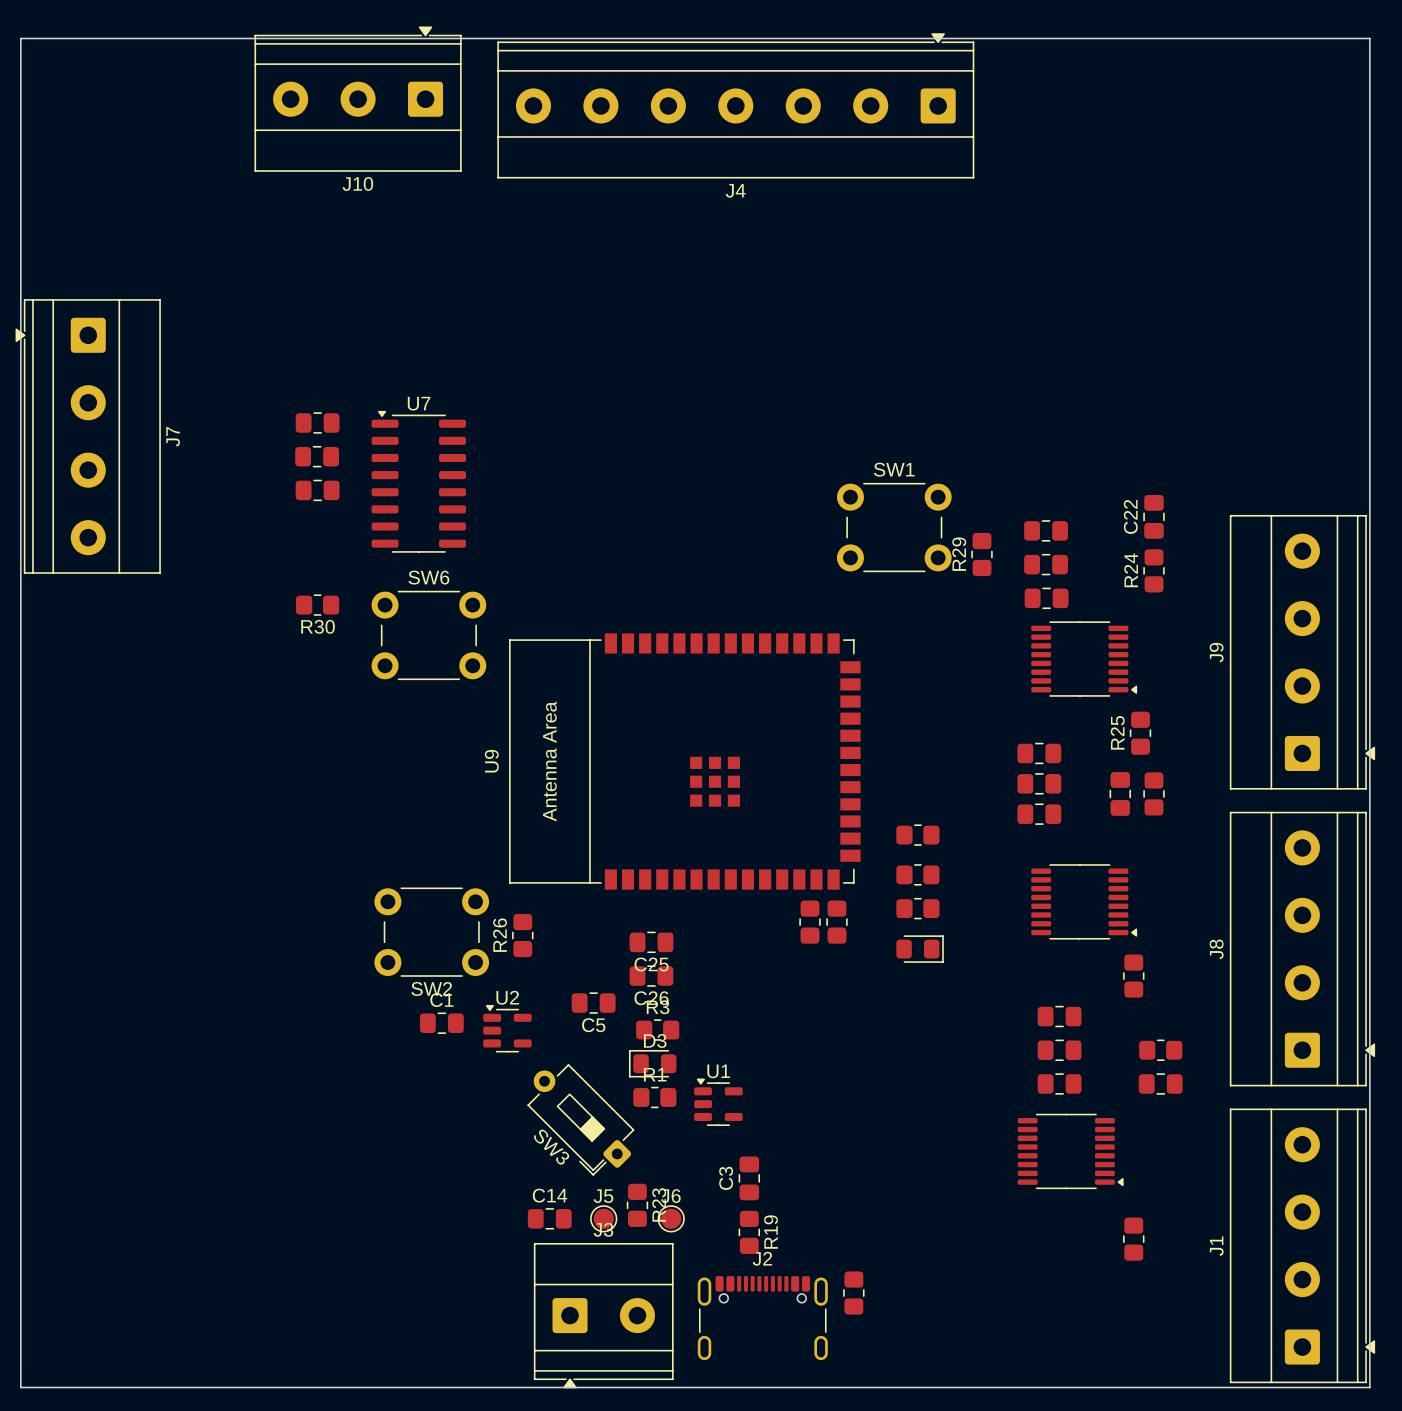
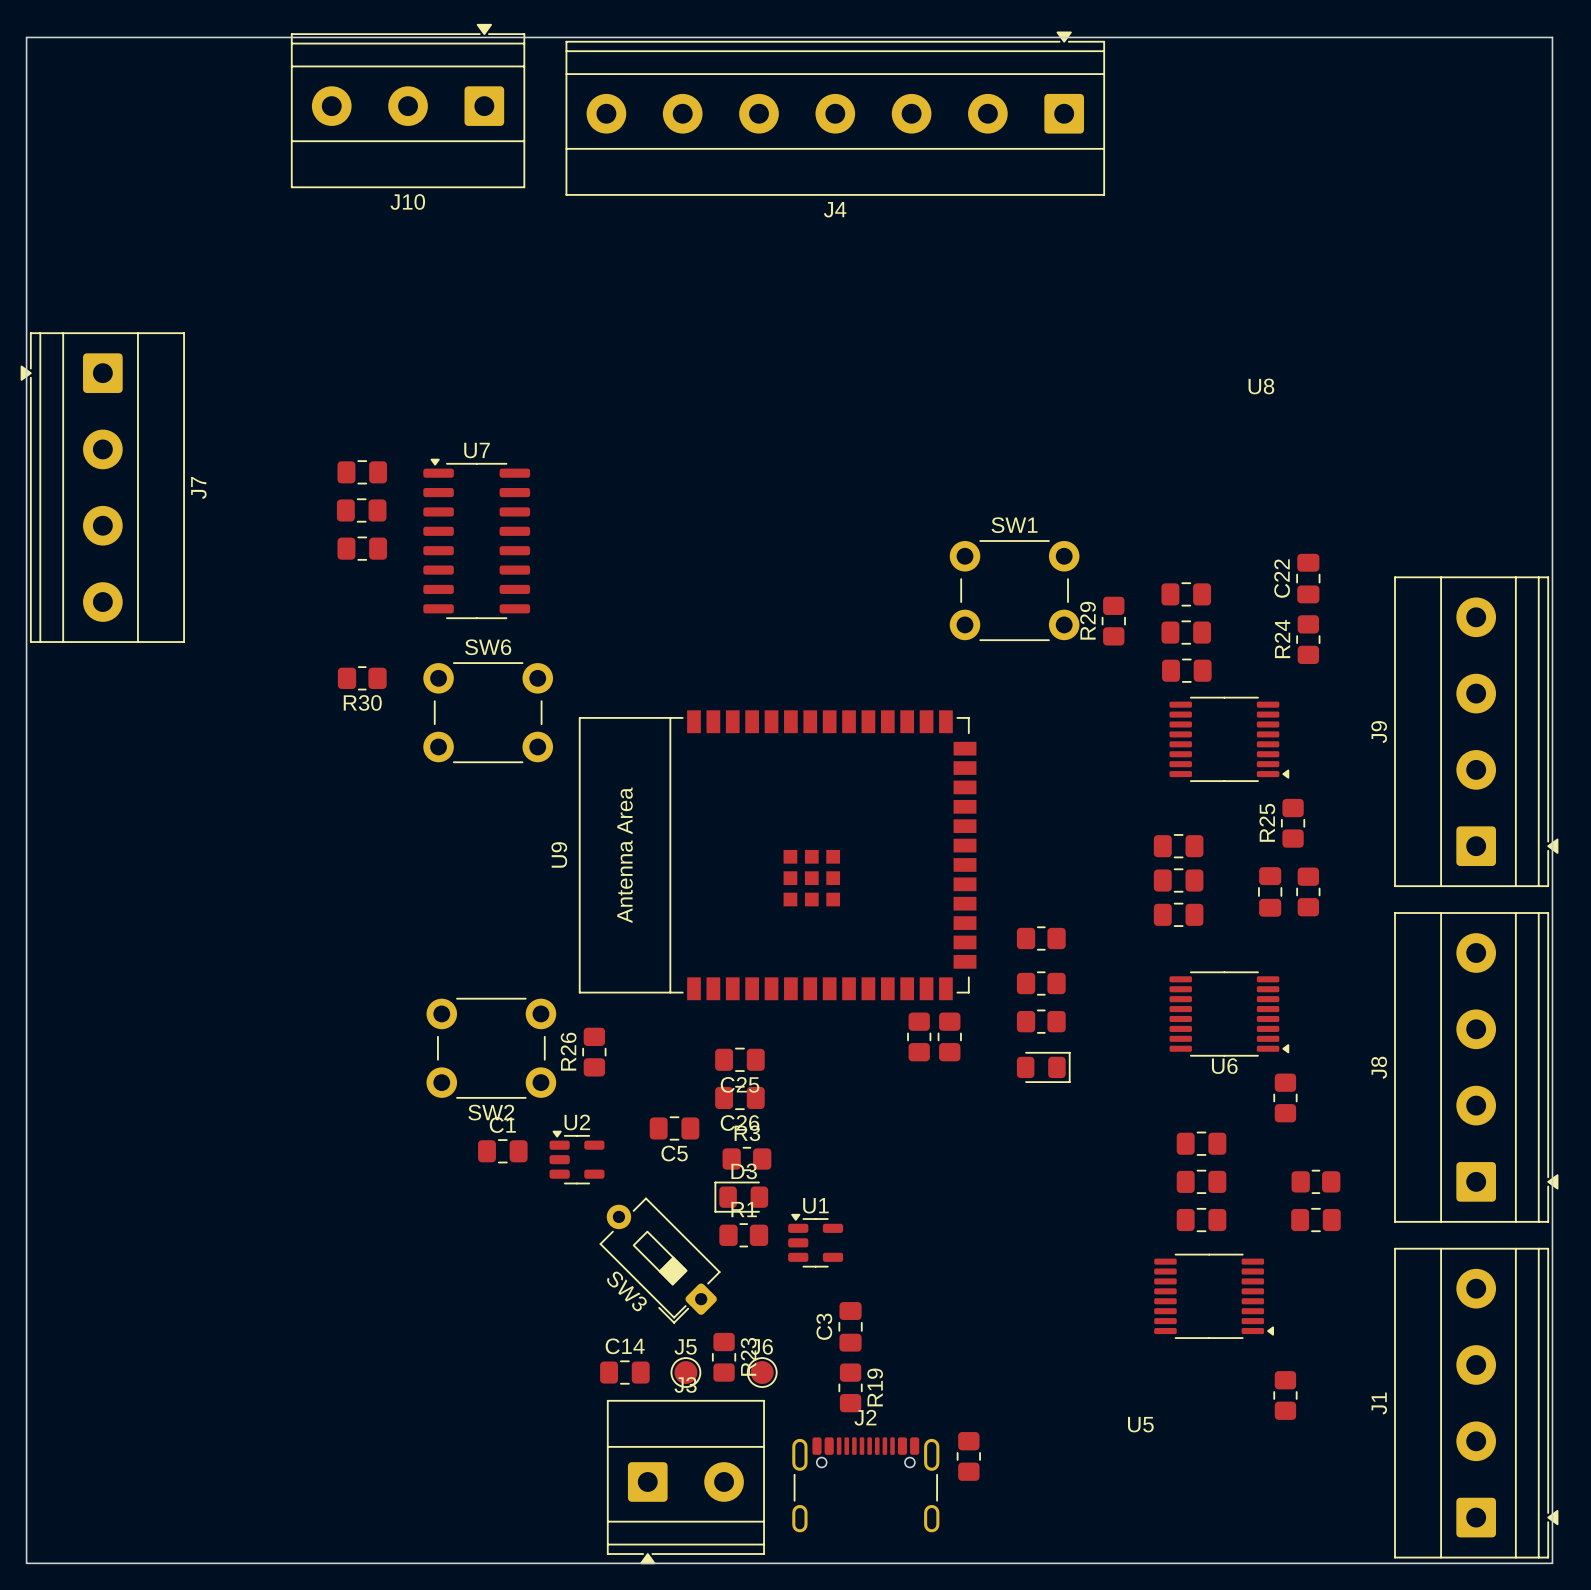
U8 name: none -> U8 (1261, 386)
U6 name: none -> U6 (1224, 1066)
U5 name: none -> U5 (1140, 1424)

